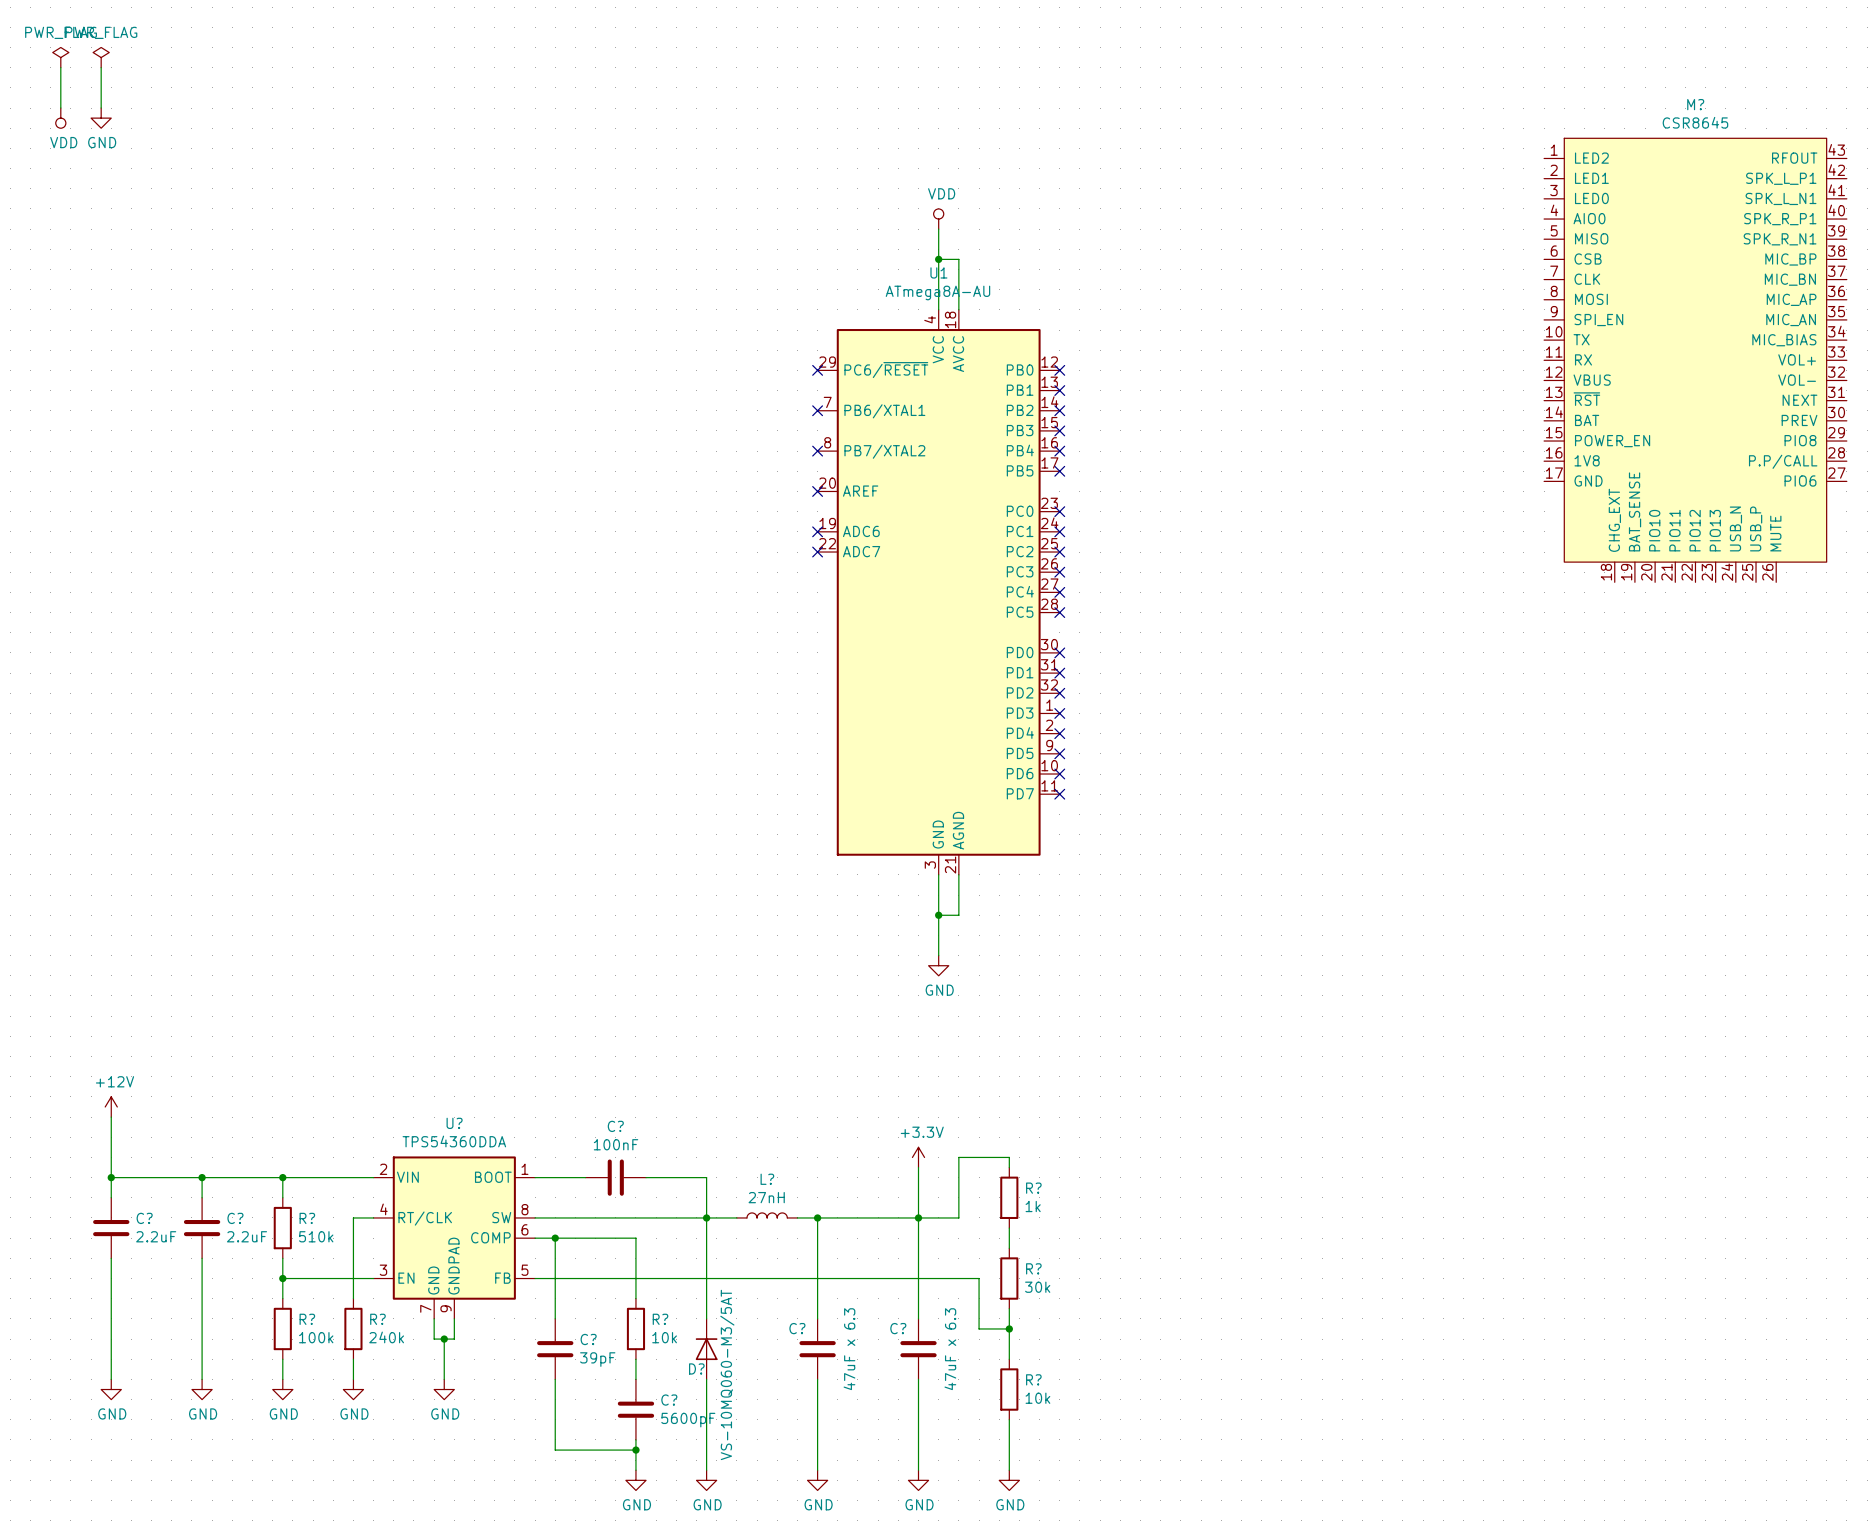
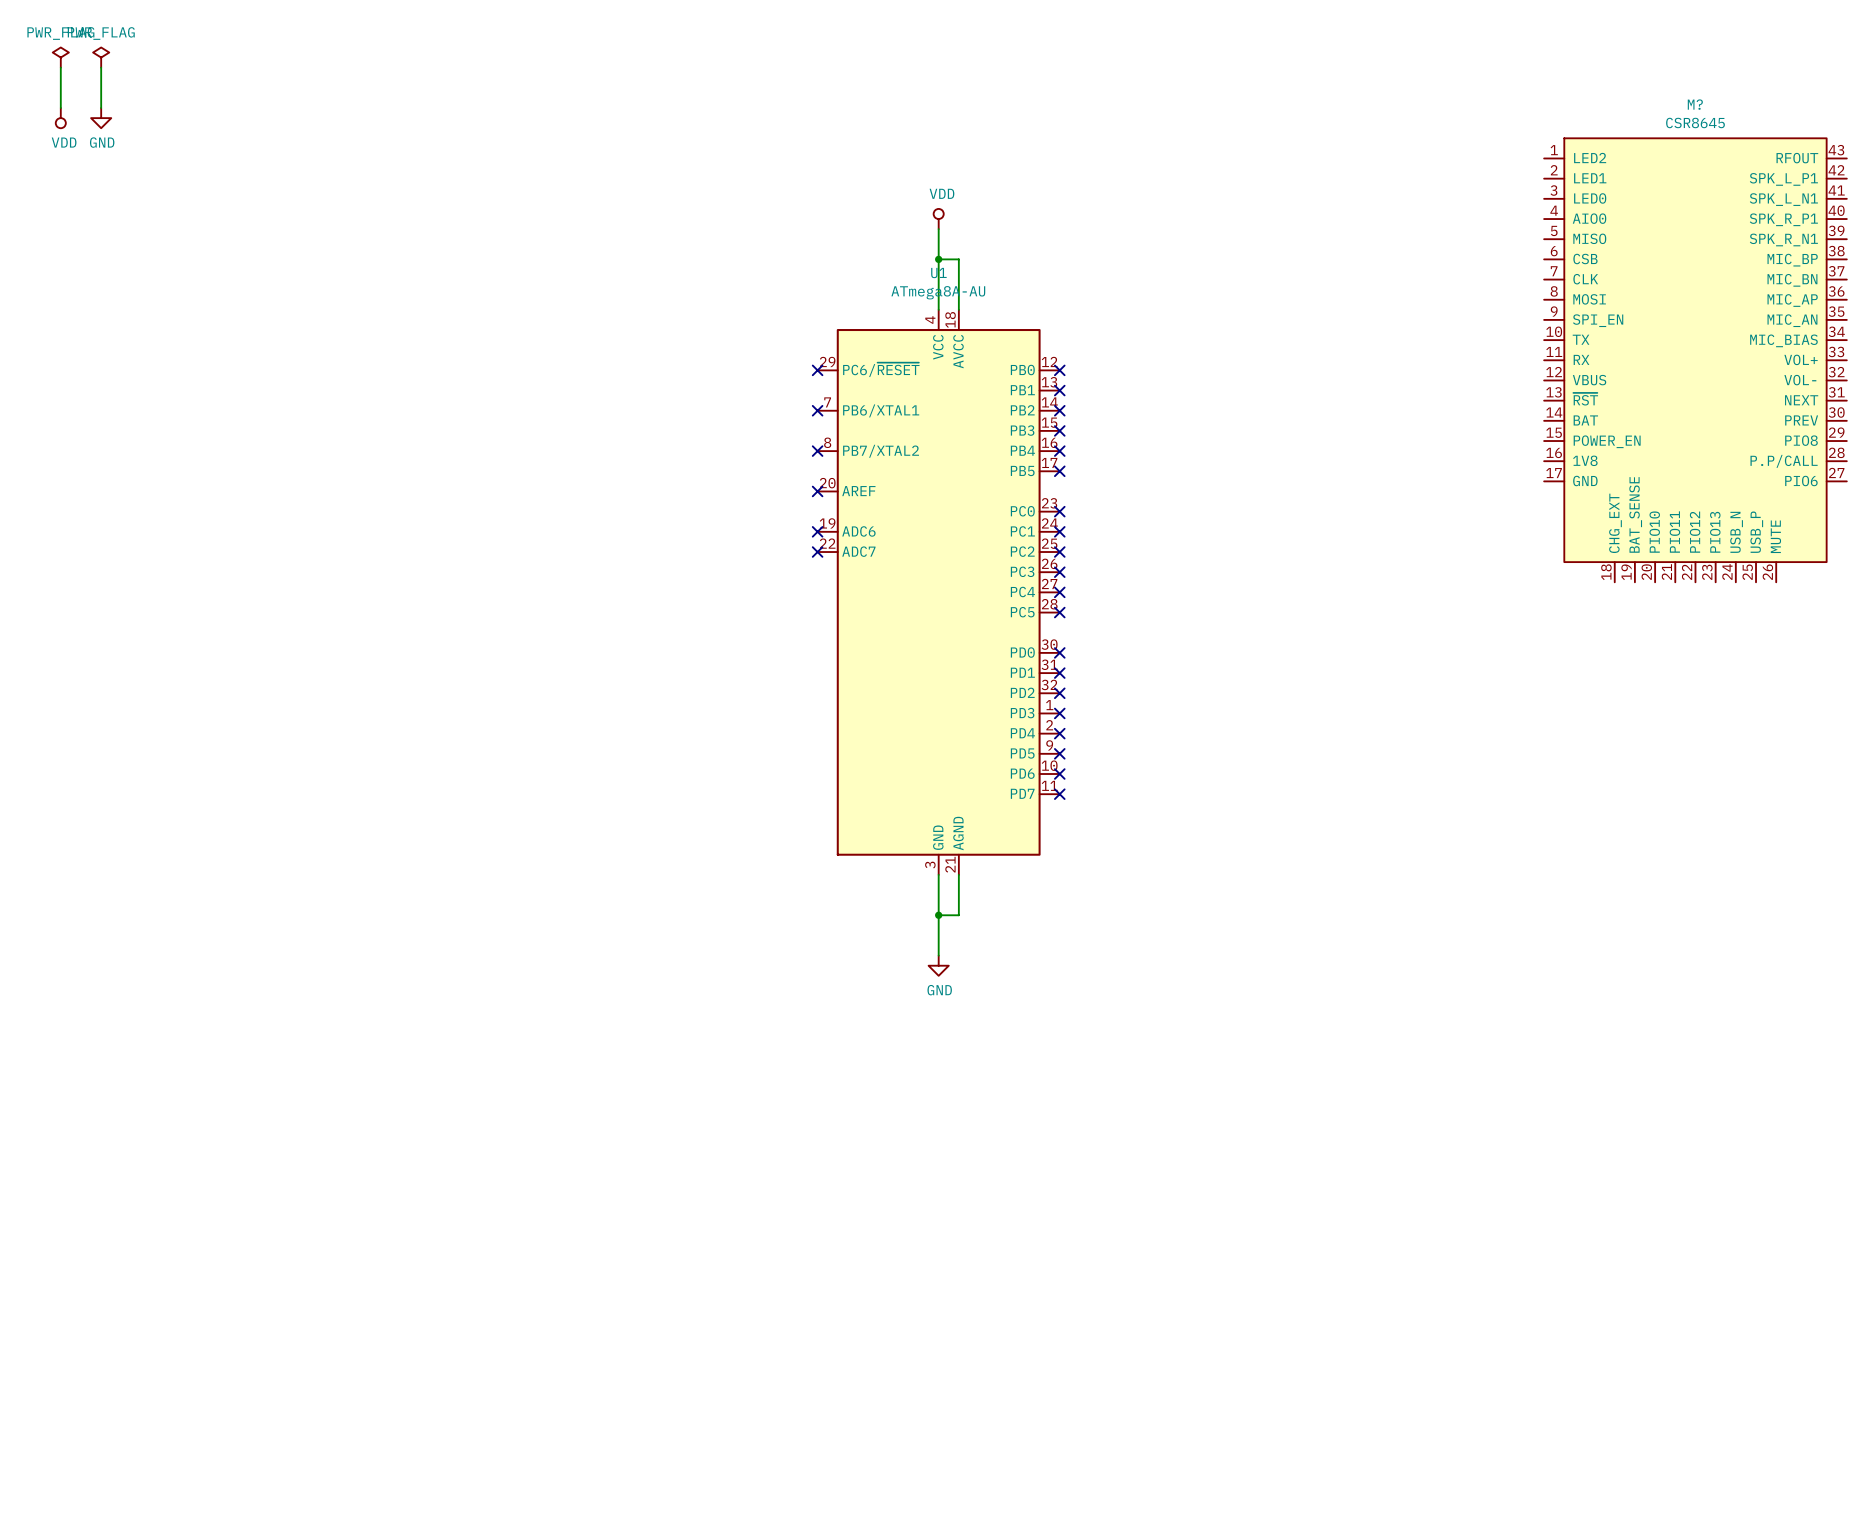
power symbol: +12V (111, 1106) -> none
wire: (111, 1117) (111, 1197) -> none
power symbol: +3.3V (918, 1157) -> none
wire: (918, 1167) (918, 1318) -> none
wire: (1009, 1167) (1009, 1157) (958, 1157) (958, 1217) (797, 1217) -> none
wire: (111, 1177) (373, 1177) -> none
junction: (111, 1177) -> none
wire: (202, 1177) (202, 1197) -> none
junction: (202, 1177) -> none
wire: (282, 1177) (282, 1197) -> none
junction: (282, 1177) -> none
wire: (535, 1177) (585, 1177) -> none
C?: 100nF (615, 1177) -> none
wire: (646, 1177) (706, 1177) (706, 1318) -> none
R?: 1k (1009, 1197) -> none
L?: 27nH (767, 1215) -> none
wire: (373, 1217) (353, 1217) (353, 1298) -> none
wire: (535, 1217) (736, 1217) -> none
junction: (706, 1217) -> none
wire: (817, 1217) (817, 1318) -> none
junction: (817, 1217) -> none
junction: (918, 1217) -> none
C?: 2.2uF (111, 1228) -> none
C?: 2.2uF (202, 1228) -> none
R?: 510k (282, 1228) -> none
wire: (1009, 1228) (1009, 1248) -> none
U?: TPS54360DDA (454, 1237) -> none
wire: (535, 1238) (635, 1238) (635, 1298) -> none
wire: (555, 1238) (555, 1318) -> none
junction: (555, 1238) -> none
wire: (111, 1258) (111, 1379) -> none
wire: (202, 1258) (202, 1379) -> none
wire: (282, 1258) (282, 1298) -> none
wire: (282, 1278) (373, 1278) -> none
junction: (282, 1278) -> none
wire: (535, 1278) (979, 1278) (979, 1328) (1009, 1328) -> none
R?: 30k (1009, 1278) -> none
wire: (1009, 1308) (1009, 1359) -> none
wire: (434, 1318) (434, 1339) (454, 1339) (454, 1318) -> none
R?: 100k (282, 1328) -> none
R?: 240k (353, 1328) -> none
R?: 10k (635, 1328) -> none
junction: (1009, 1328) -> none
wire: (444, 1339) (444, 1379) -> none
junction: (444, 1339) -> none
C?: 39pF (555, 1349) -> none
D?: VS-10MQ060-M3/5AT (706, 1349) -> none
C?: 47uF x 6.3 (817, 1349) -> none
C?: 47uF x 6.3 (918, 1349) -> none
wire: (282, 1359) (282, 1379) -> none
wire: (353, 1359) (353, 1379) -> none
wire: (635, 1359) (635, 1379) -> none
wire: (555, 1379) (555, 1450) (635, 1450) -> none
wire: (706, 1379) (706, 1470) -> none
wire: (817, 1379) (817, 1470) -> none
wire: (918, 1379) (918, 1470) -> none
power symbol: GND (111, 1389) -> none
power symbol: GND (202, 1389) -> none
power symbol: GND (282, 1389) -> none
power symbol: GND (353, 1389) -> none
power symbol: GND (444, 1389) -> none
R?: 10k (1009, 1389) -> none
C?: 5600pF (635, 1409) -> none
wire: (1009, 1419) (1009, 1470) -> none
wire: (635, 1439) (635, 1470) -> none
junction: (635, 1450) -> none
power symbol: GND (635, 1480) -> none
power symbol: GND (706, 1480) -> none
power symbol: GND (817, 1480) -> none
power symbol: GND (918, 1480) -> none
power symbol: GND (1009, 1480) -> none

